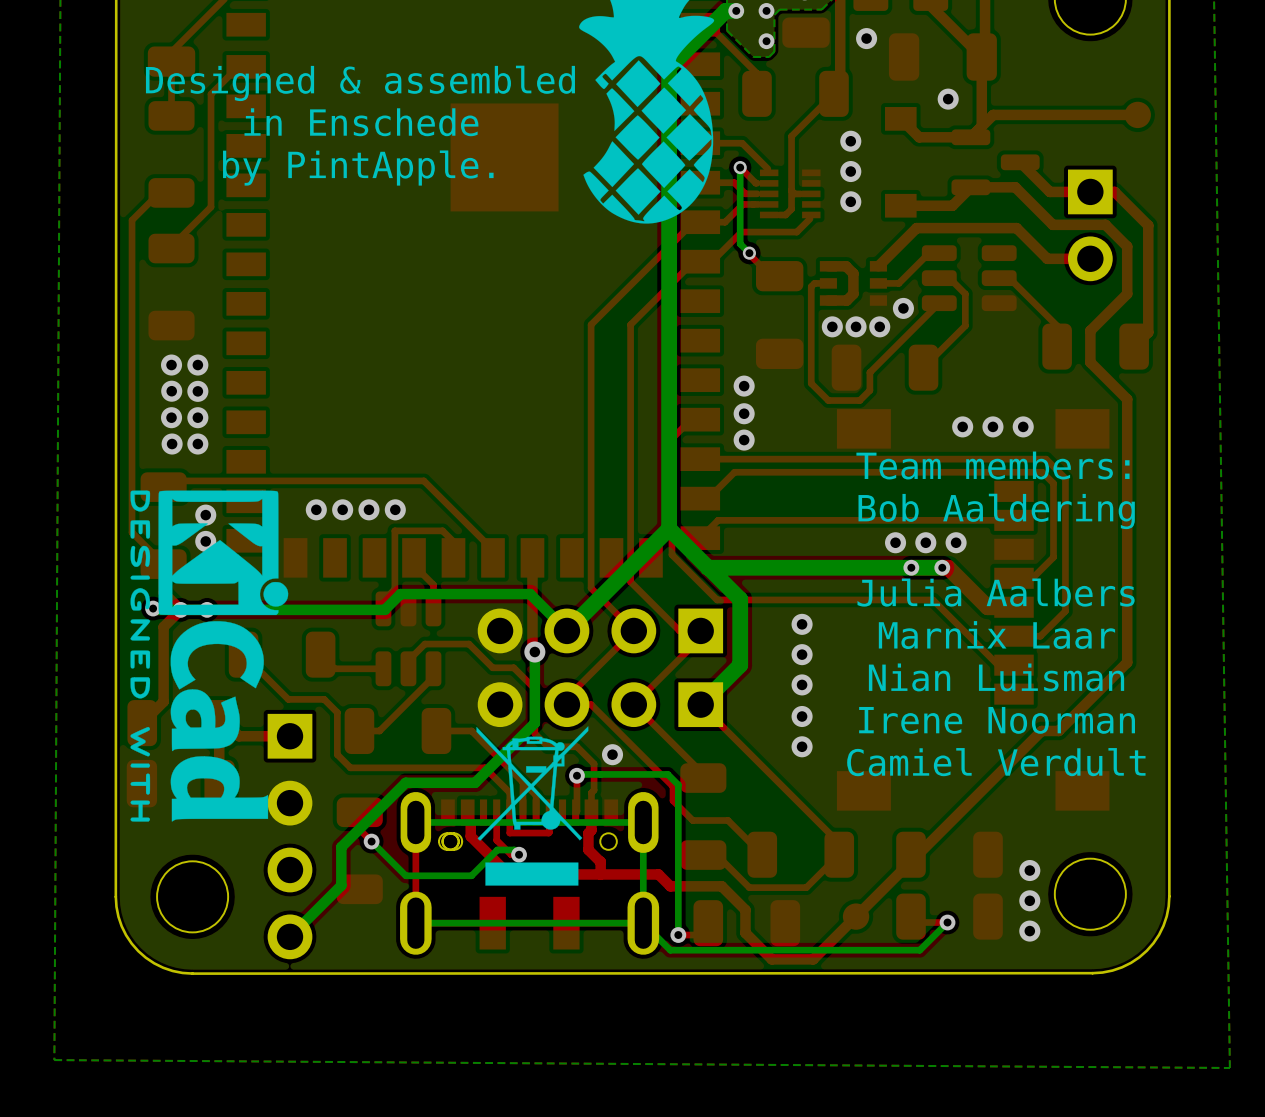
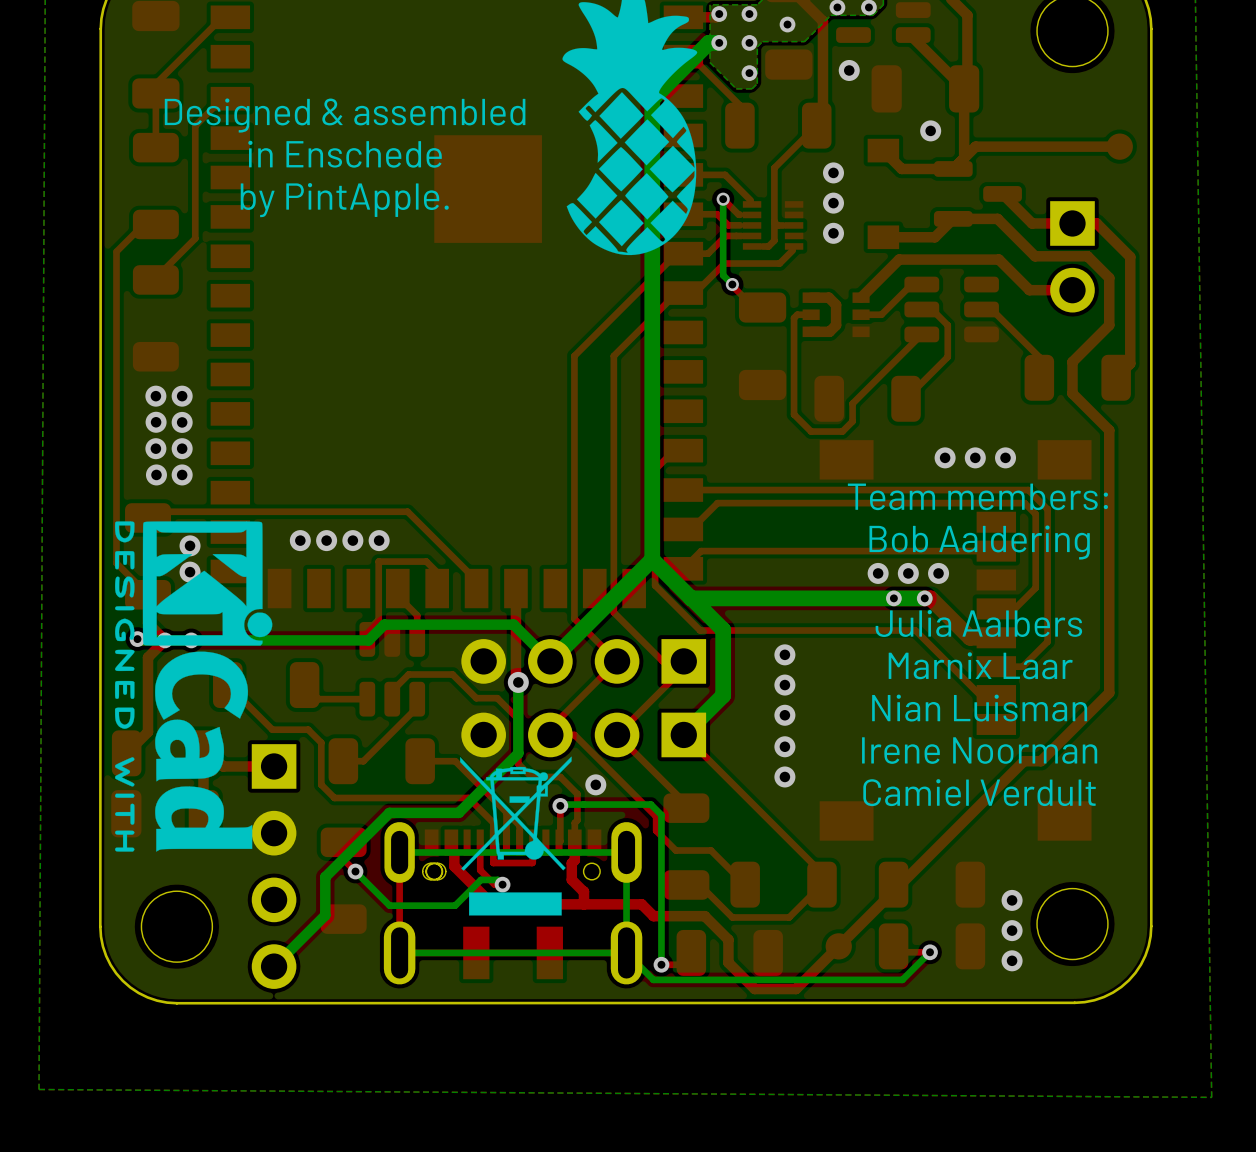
via: (903, 308) -> none
via: (832, 326) -> none
via: (856, 326) -> none
via: (879, 326) -> none
via: (744, 386) -> none
via: (744, 413) -> none
via: (744, 440) -> none

